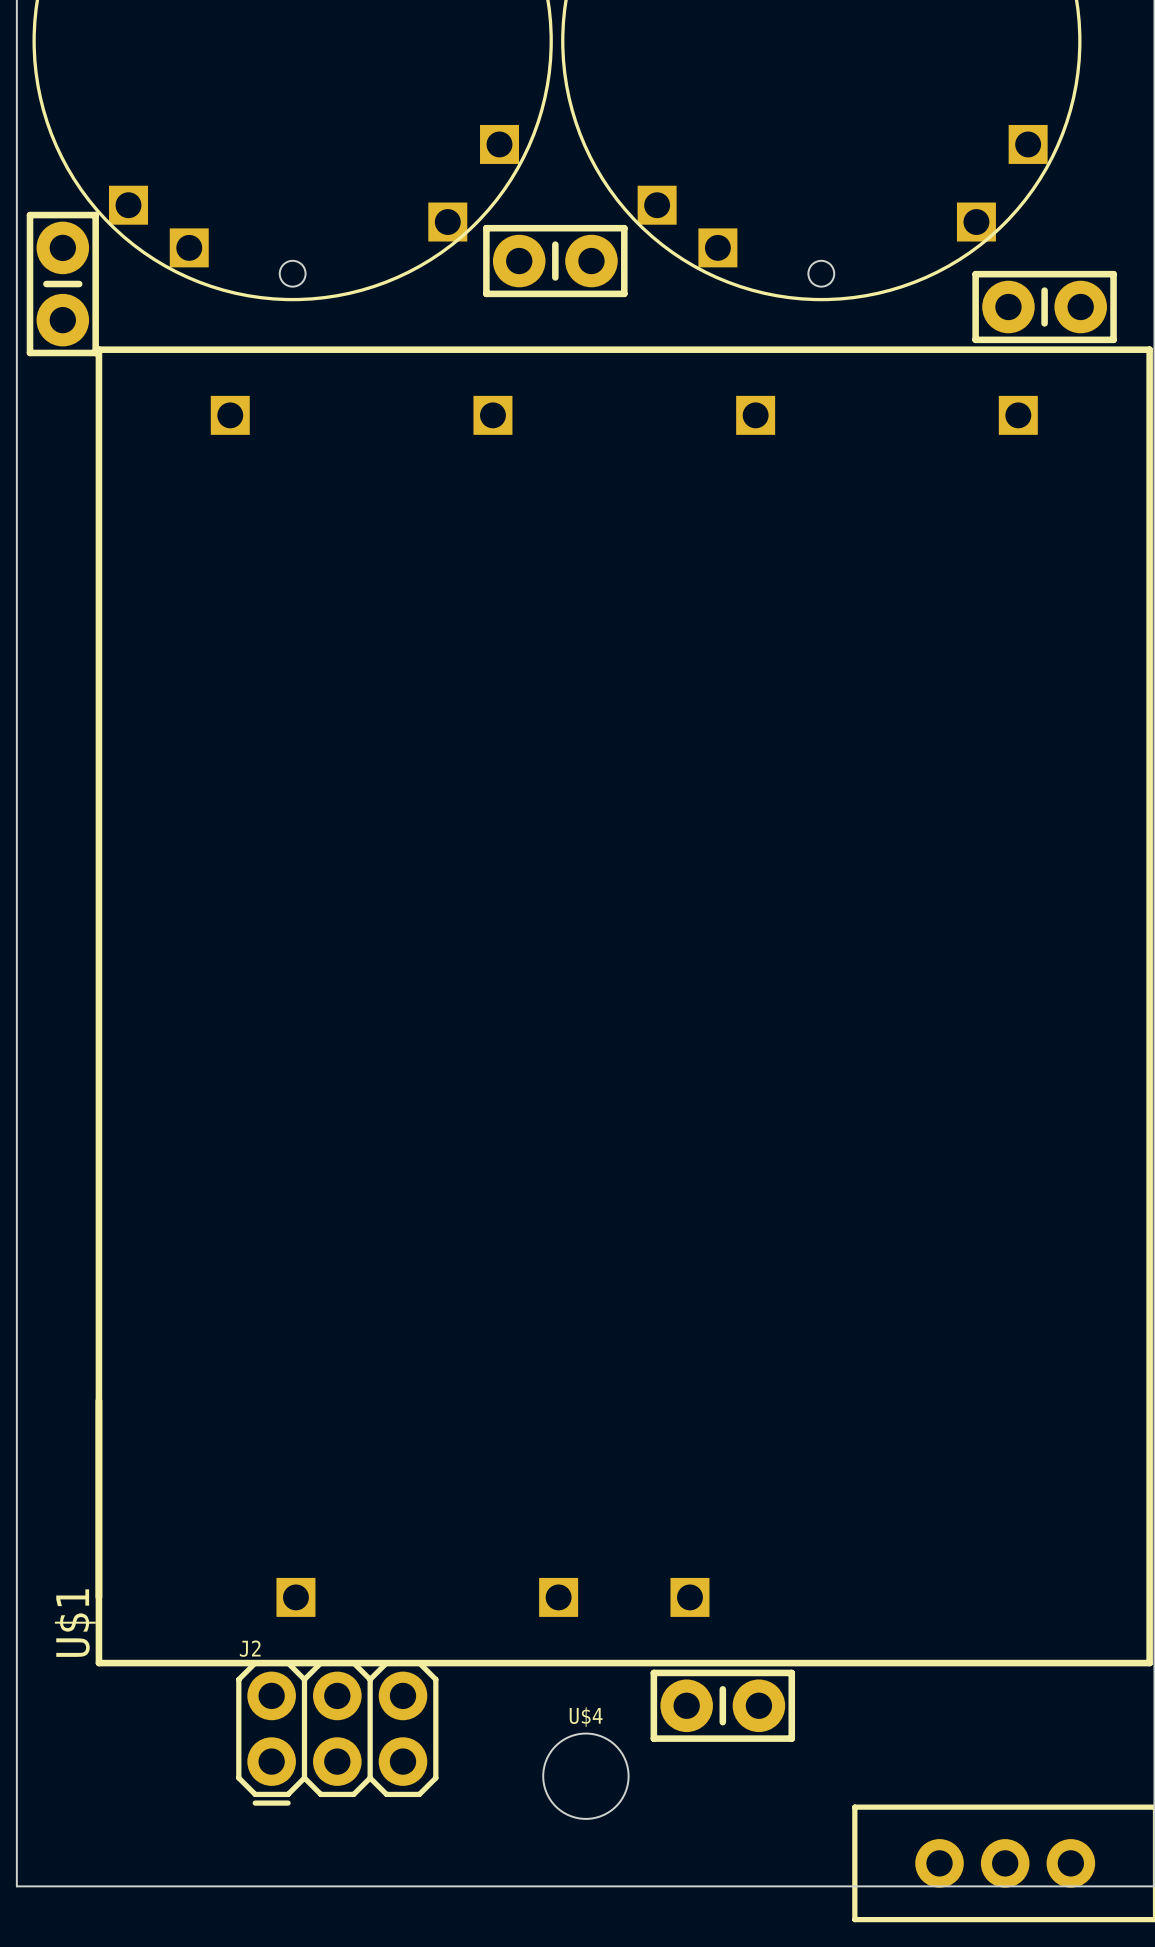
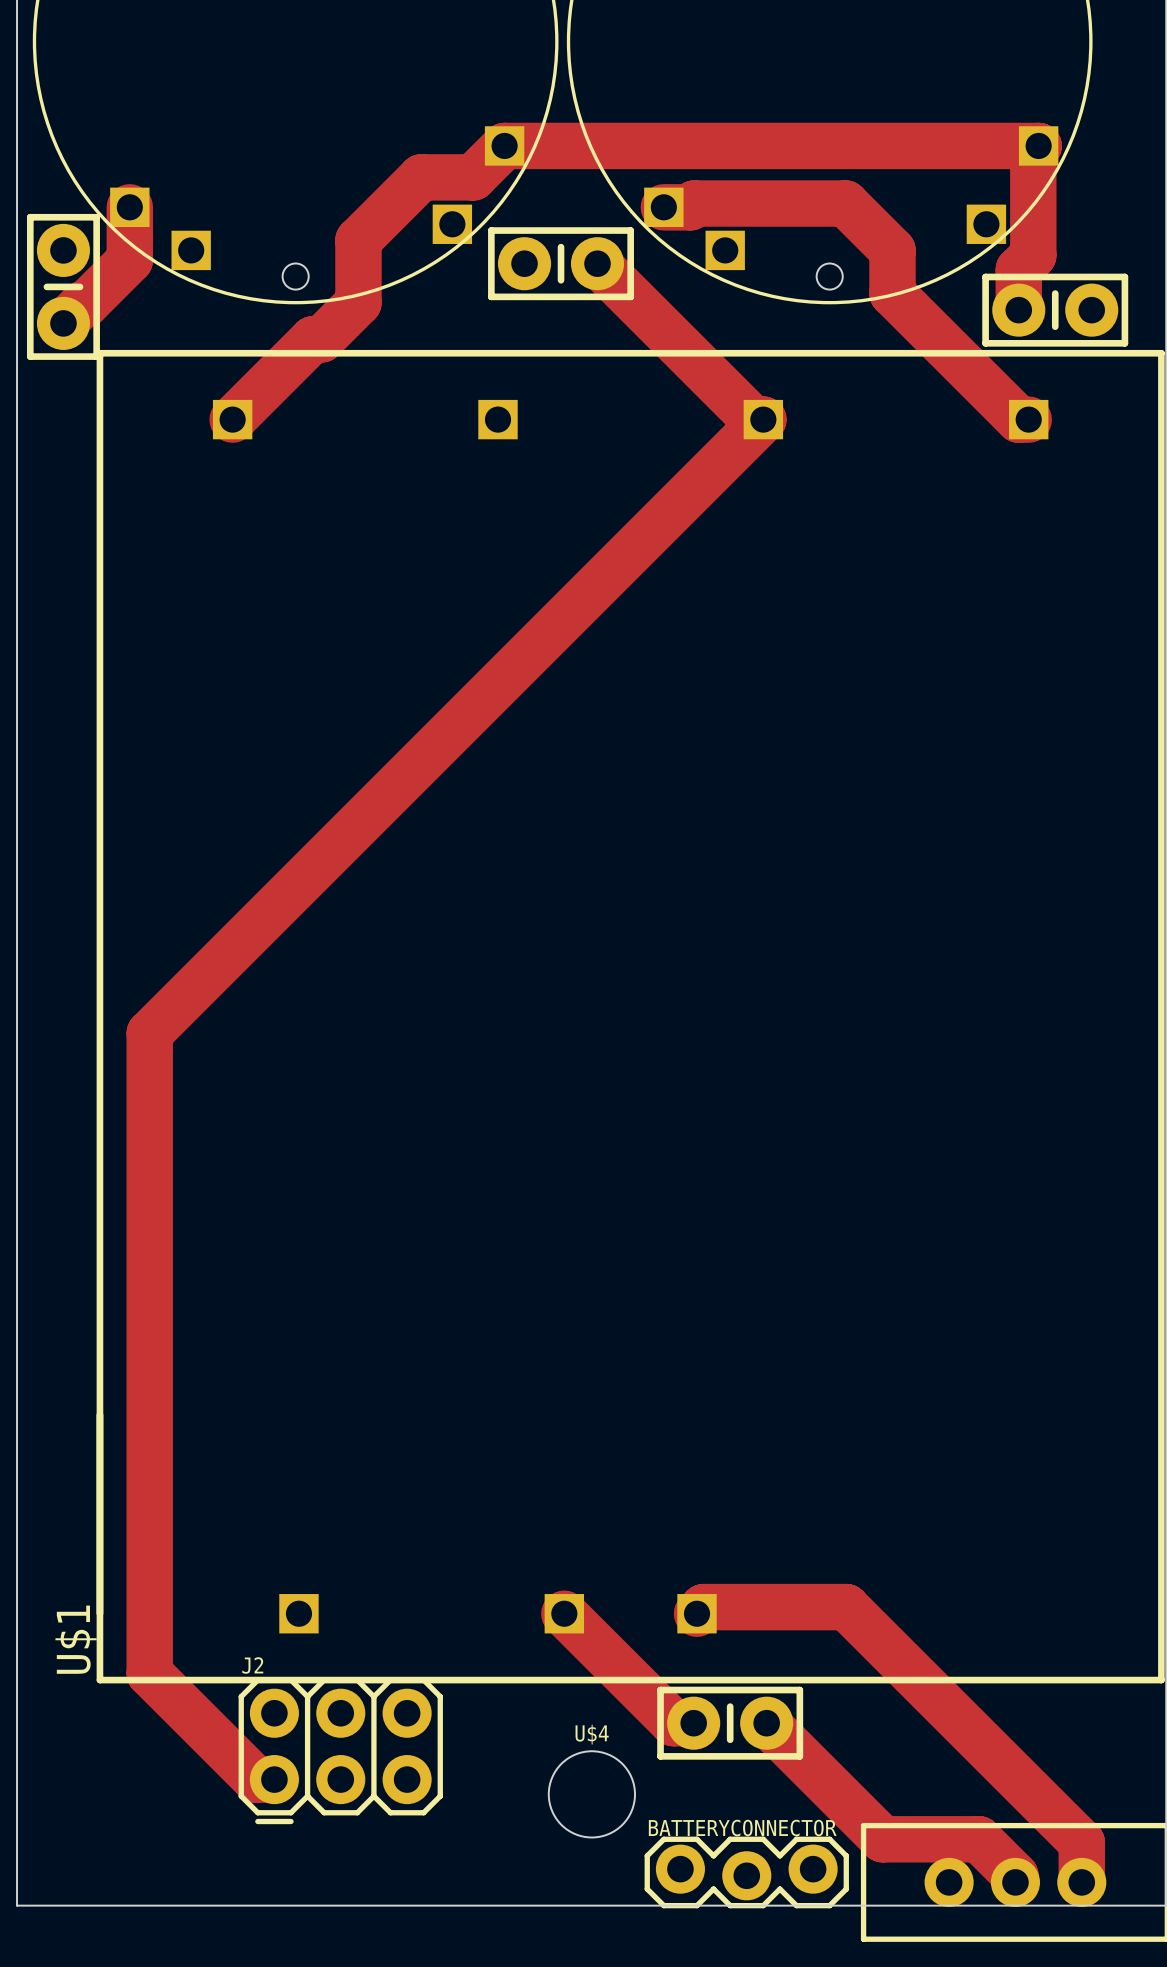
track: none -> (129, 207) (129, 260) (85, 304) (82, 304) (66, 320)
track: none -> (663, 207) (690, 207) (694, 203) (845, 203) (892, 250) (892, 293) (1018, 419) (1028, 419)
track: none -> (597, 263) (753, 419) (763, 419) (149, 1033) (149, 1673) (255, 1779) (274, 1779)
track: none -> (1018, 310) (1018, 269) (1033, 255) (1033, 151) (1038, 145) (504, 145) (473, 177) (421, 177) (358, 240) (358, 302) (321, 339) (312, 339) (232, 419)
track: none -> (564, 1613) (673, 1723) (693, 1723)
track: none -> (697, 1613) (703, 1607) (846, 1607) (1081, 1842) (1081, 1882)
track: none -> (766, 1723) (882, 1839) (978, 1839) (1015, 1875) (1015, 1882)
BATTERYCONNECTOR: none -> (746, 1872)

